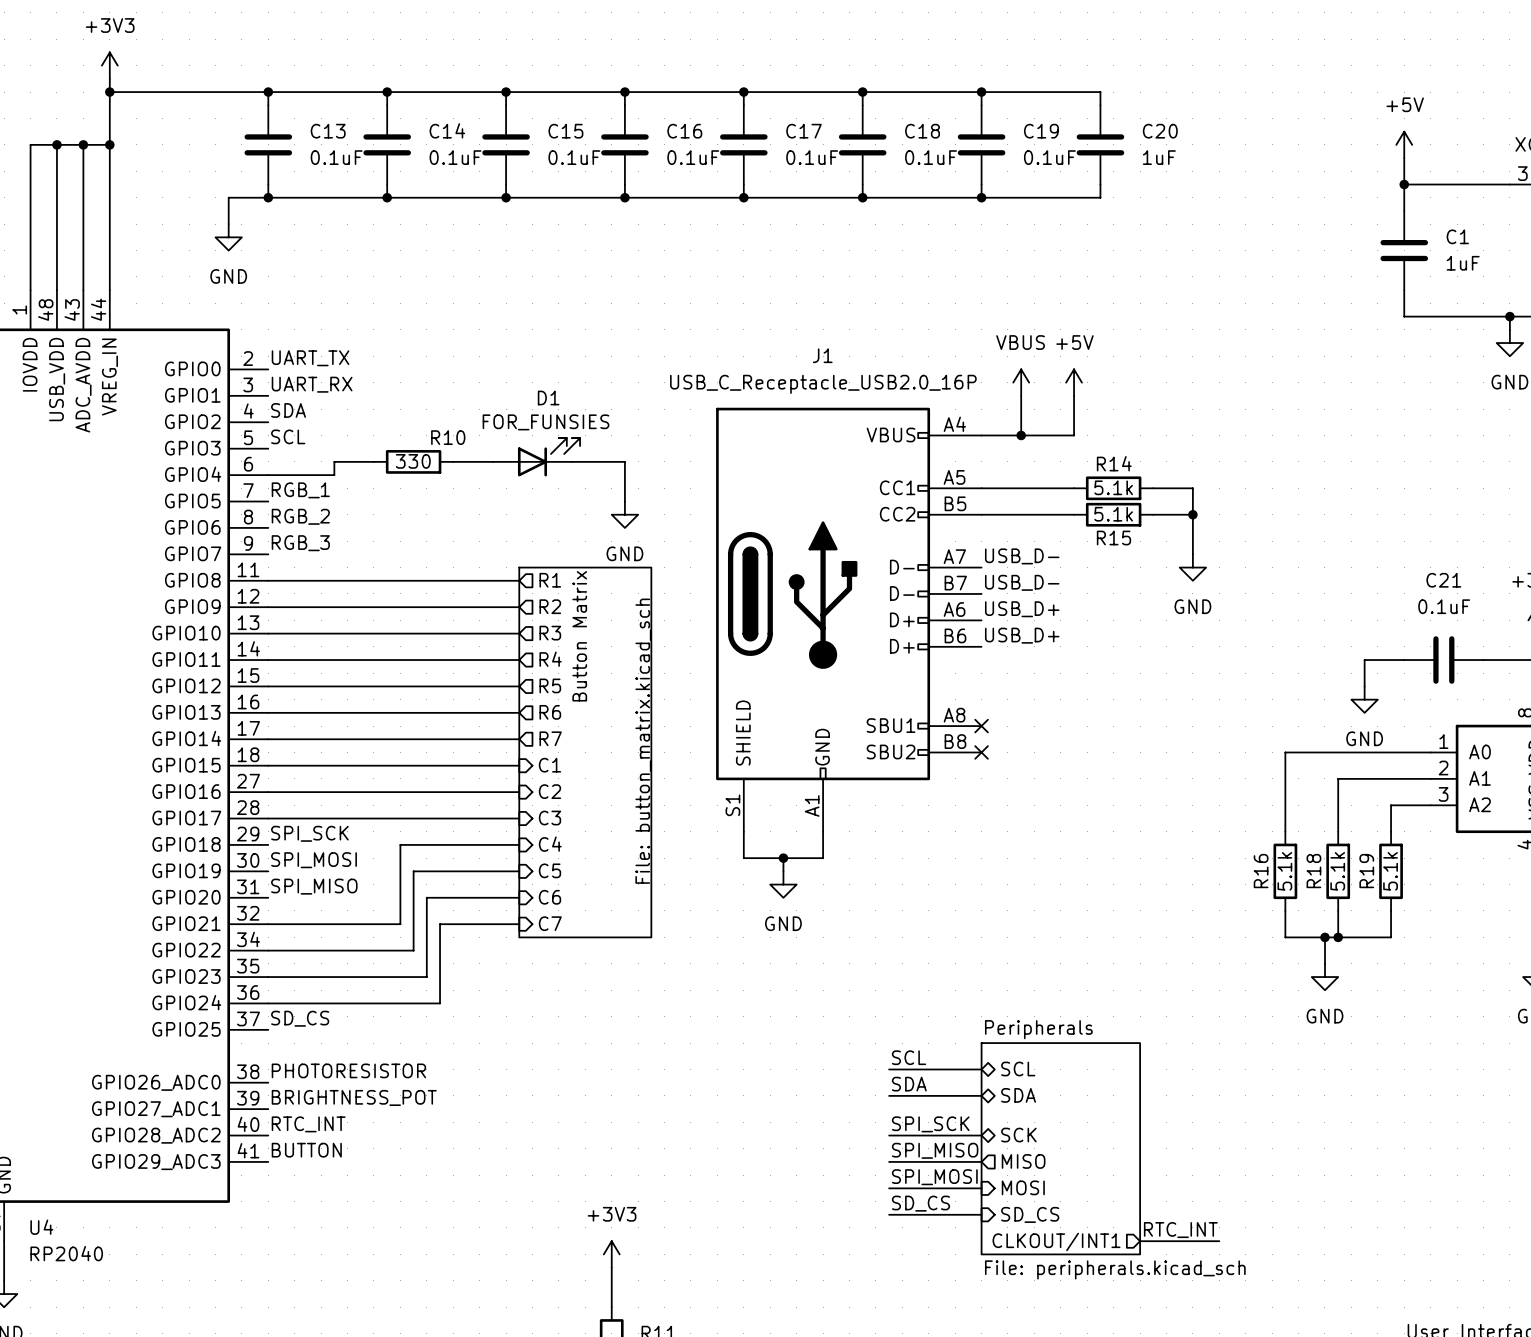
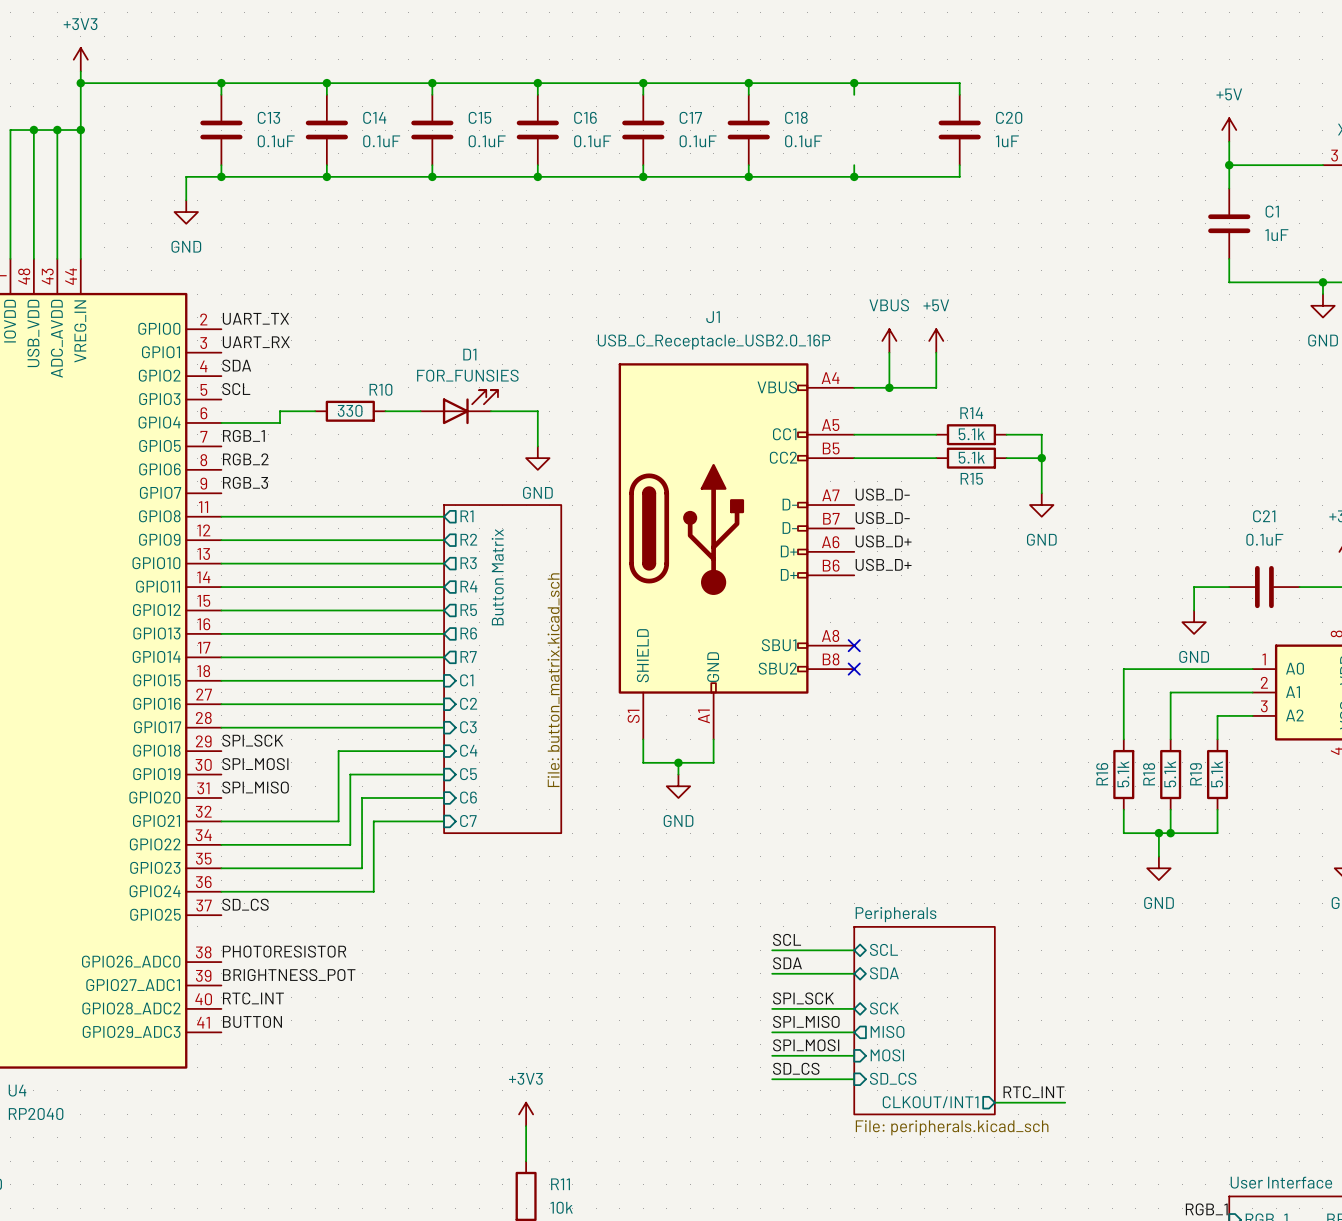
C19: 0.1uF (981, 144) -> none

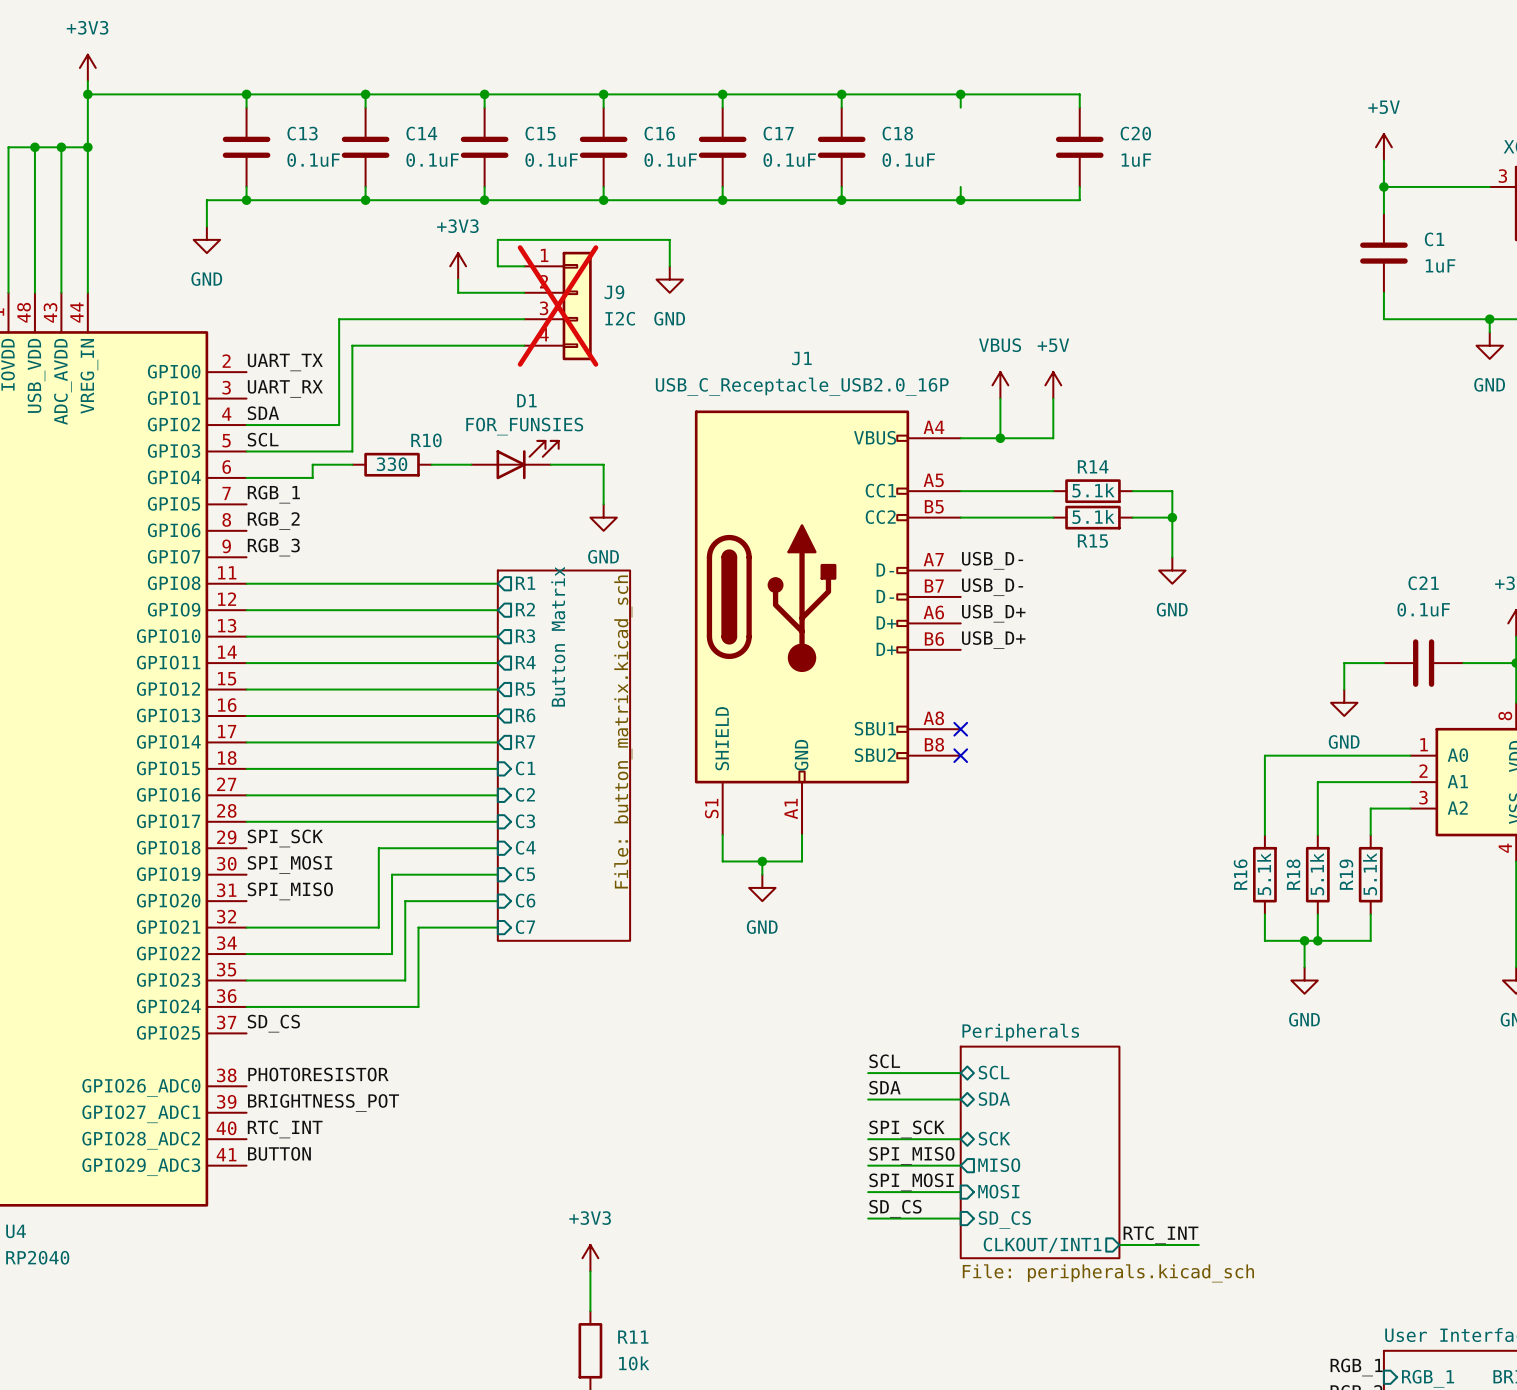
power symbol: none -> +3V3 (458, 266)
wire: none -> (524, 266) (497, 266) (497, 239) (669, 239) (669, 266)
wire: none -> (458, 279) (458, 292) (524, 292)
power symbol: none -> GND (669, 279)
J9: none -> I2C (558, 306)
wire: none -> (524, 319) (339, 319) (339, 425) (246, 425)
wire: none -> (524, 345) (352, 345) (352, 451) (246, 451)

